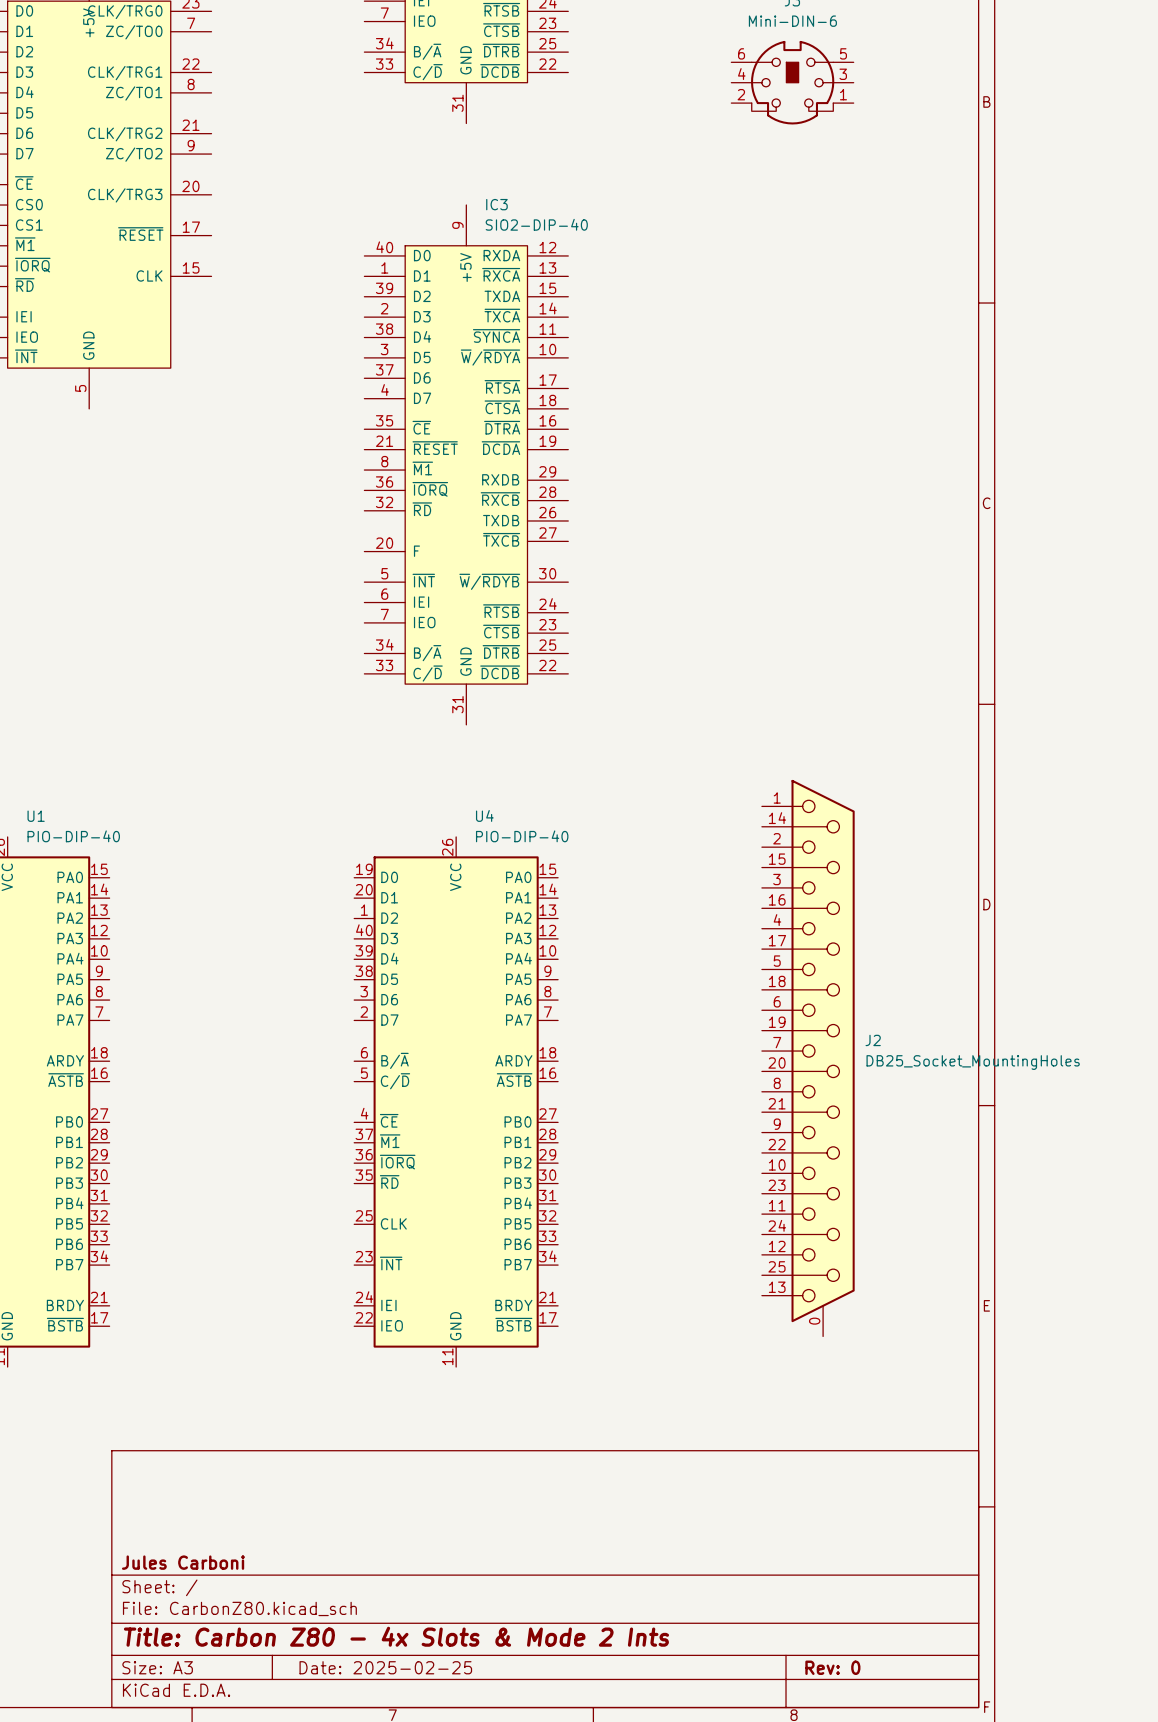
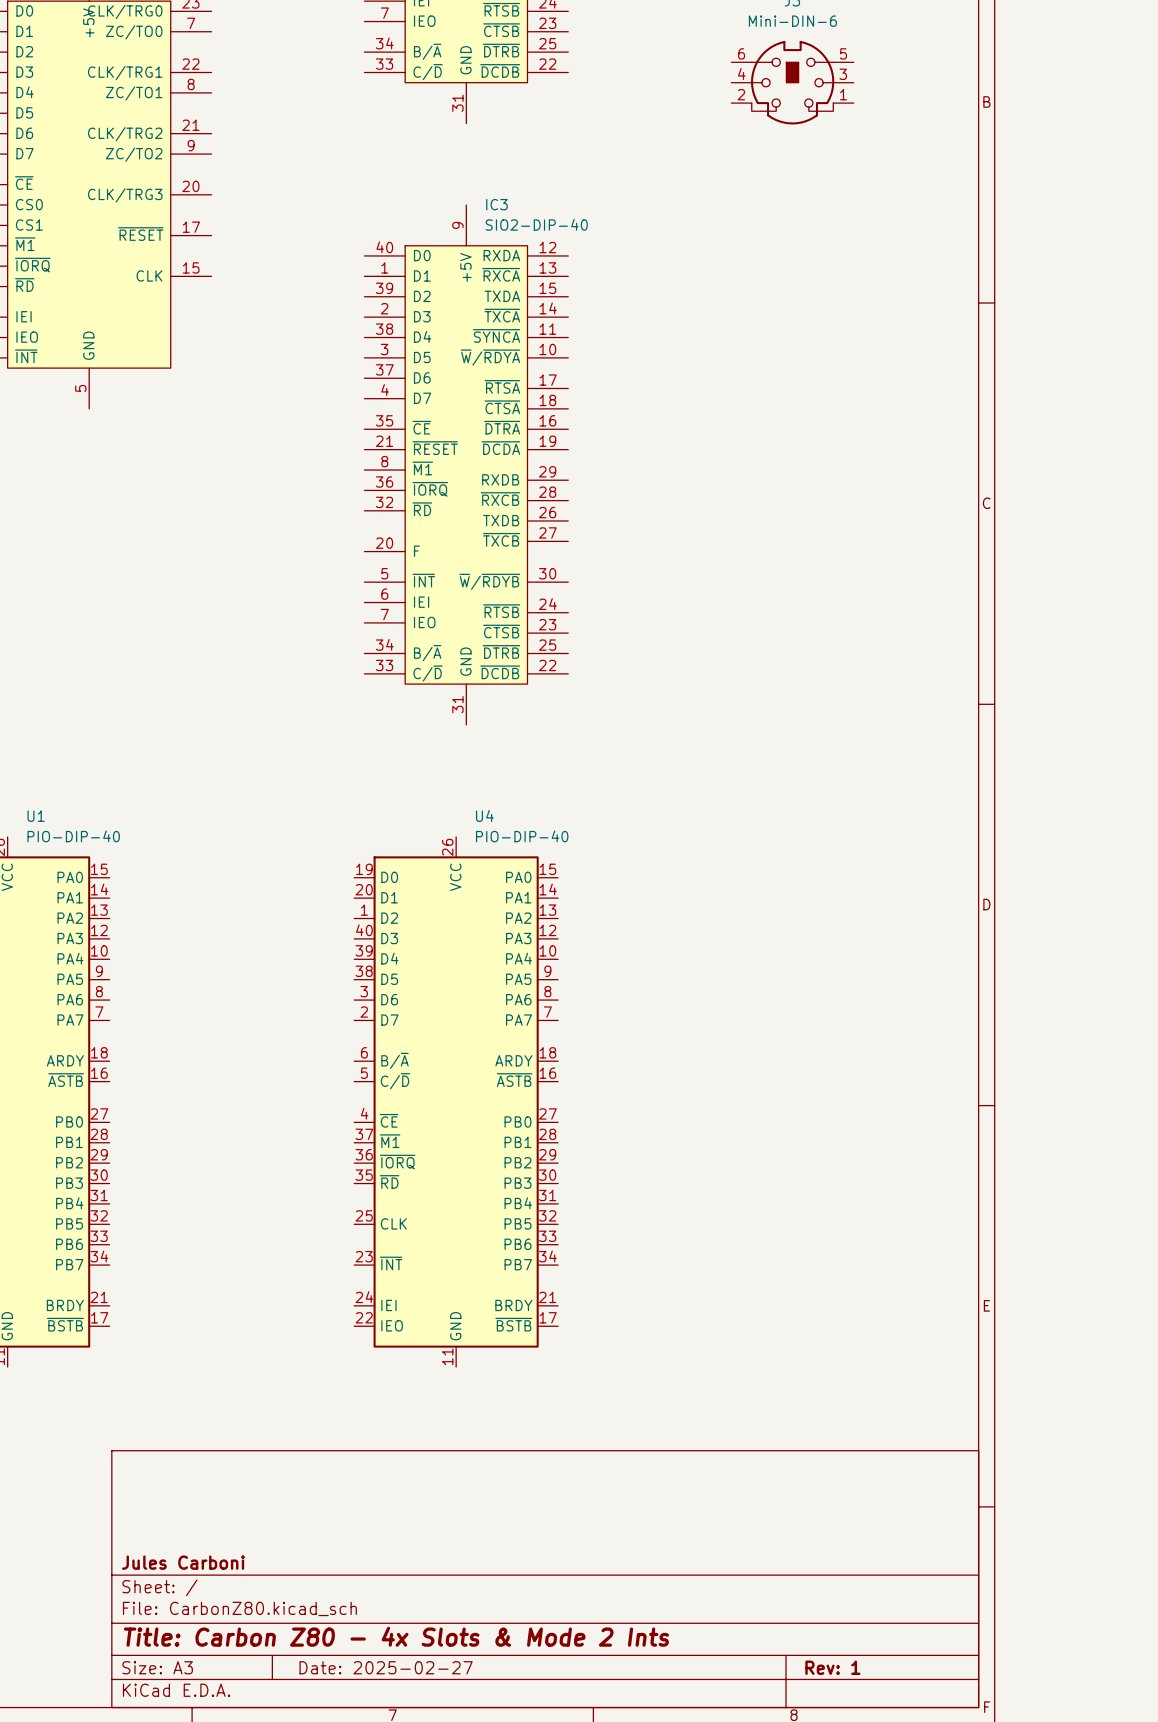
J2: DB25_Socket_MountingHoles (808, 1058) -> none
title block: Date: 2025-02-25 (385, 1667) -> Date: 2025-02-27 (386, 1667)
title block: Rev: 0 (832, 1667) -> Rev: 1 (832, 1667)

